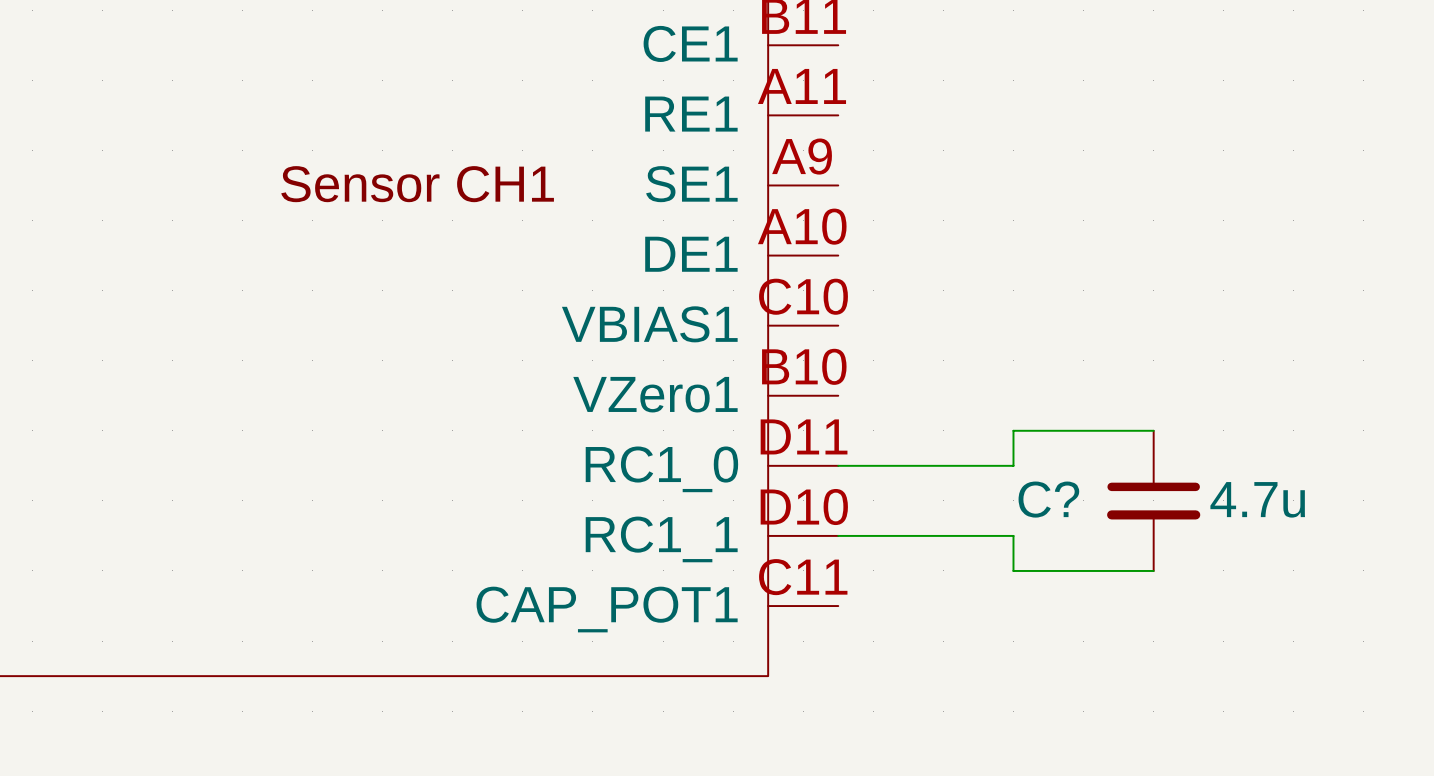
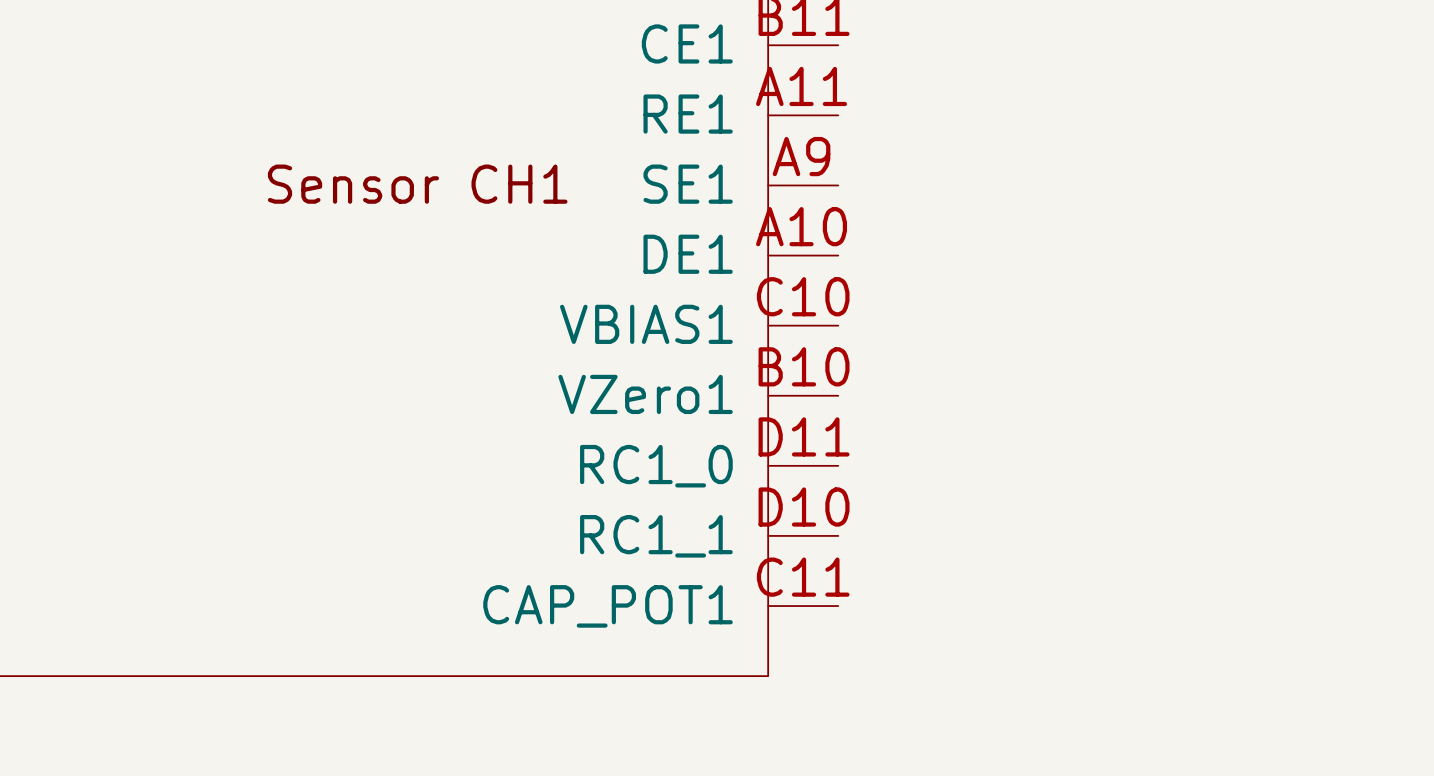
wire: (1153, 430) (1013, 430) (1013, 465) (838, 465) -> none
C?: 4.7u (1153, 500) -> none
wire: (838, 535) (1013, 535) (1013, 570) (1153, 570) -> none

